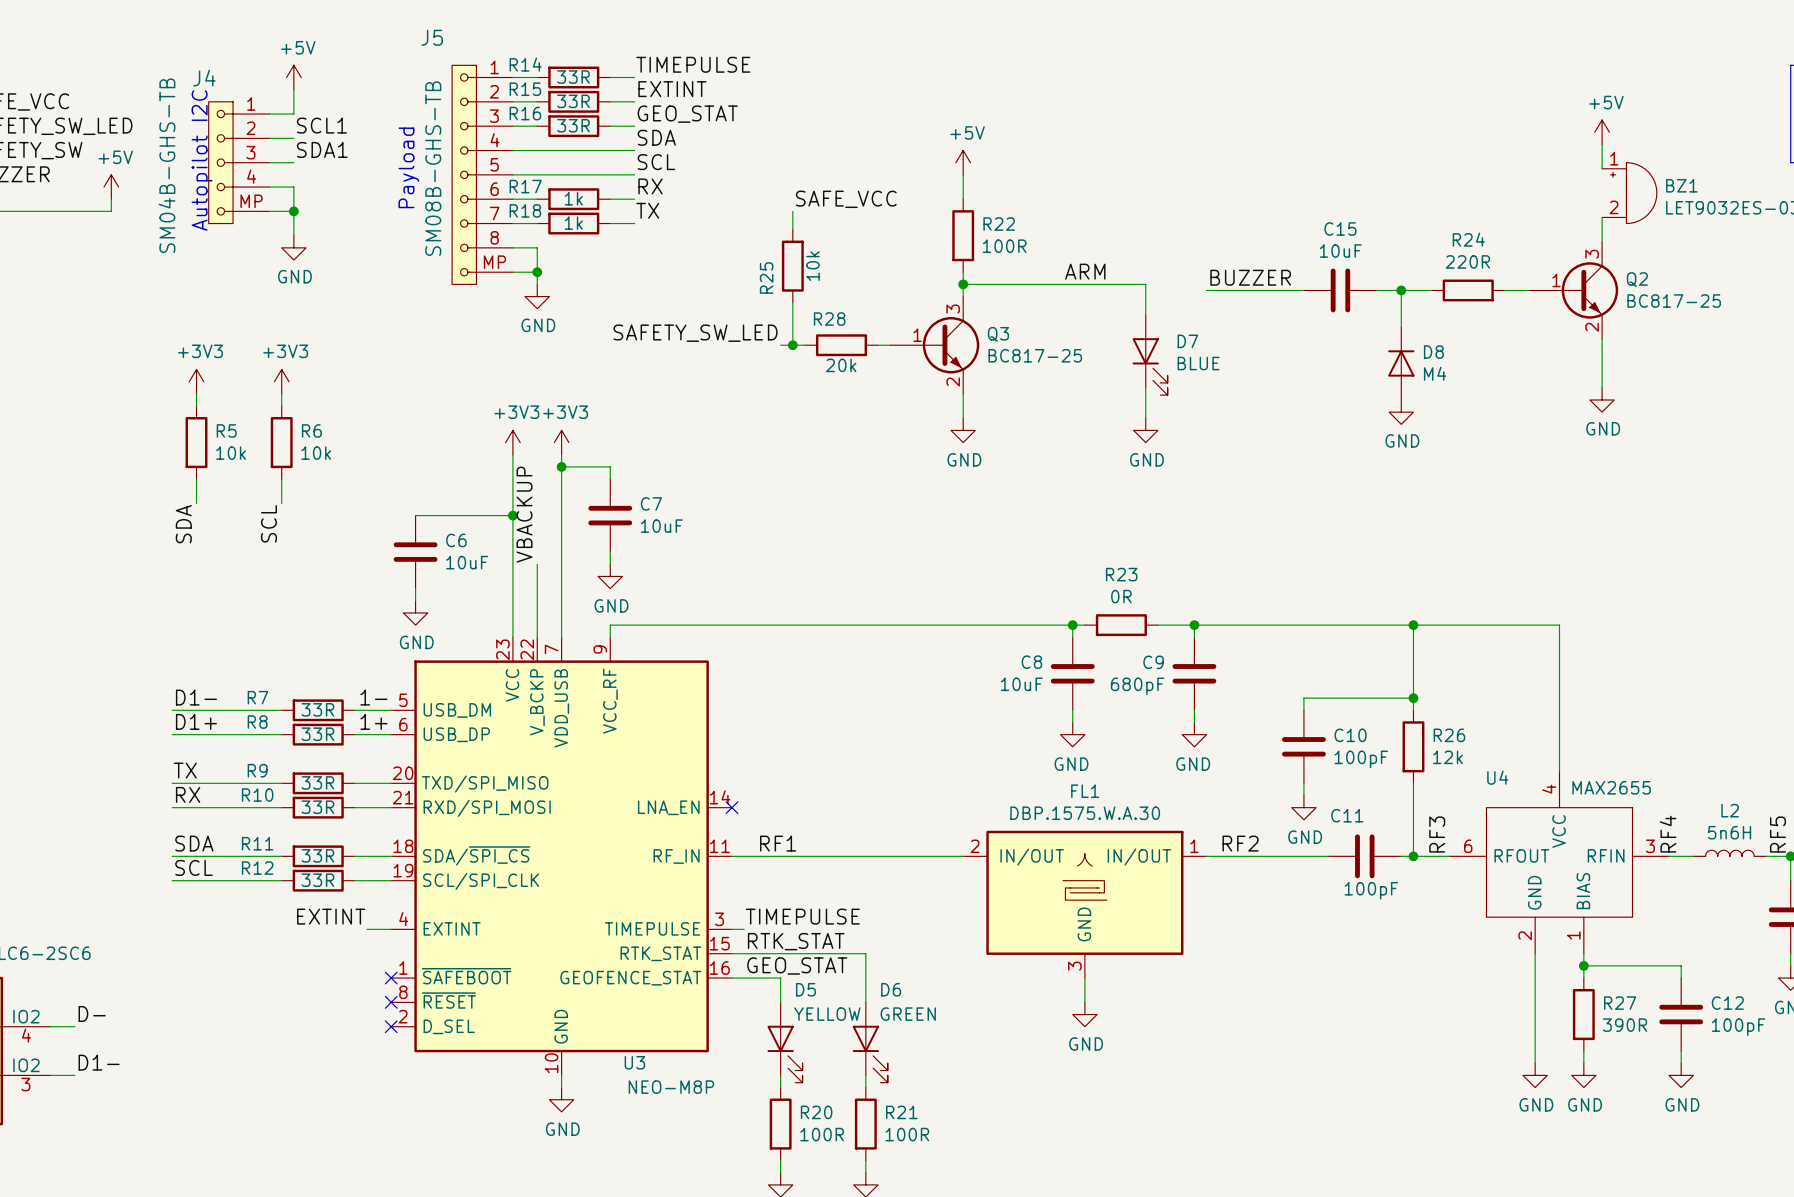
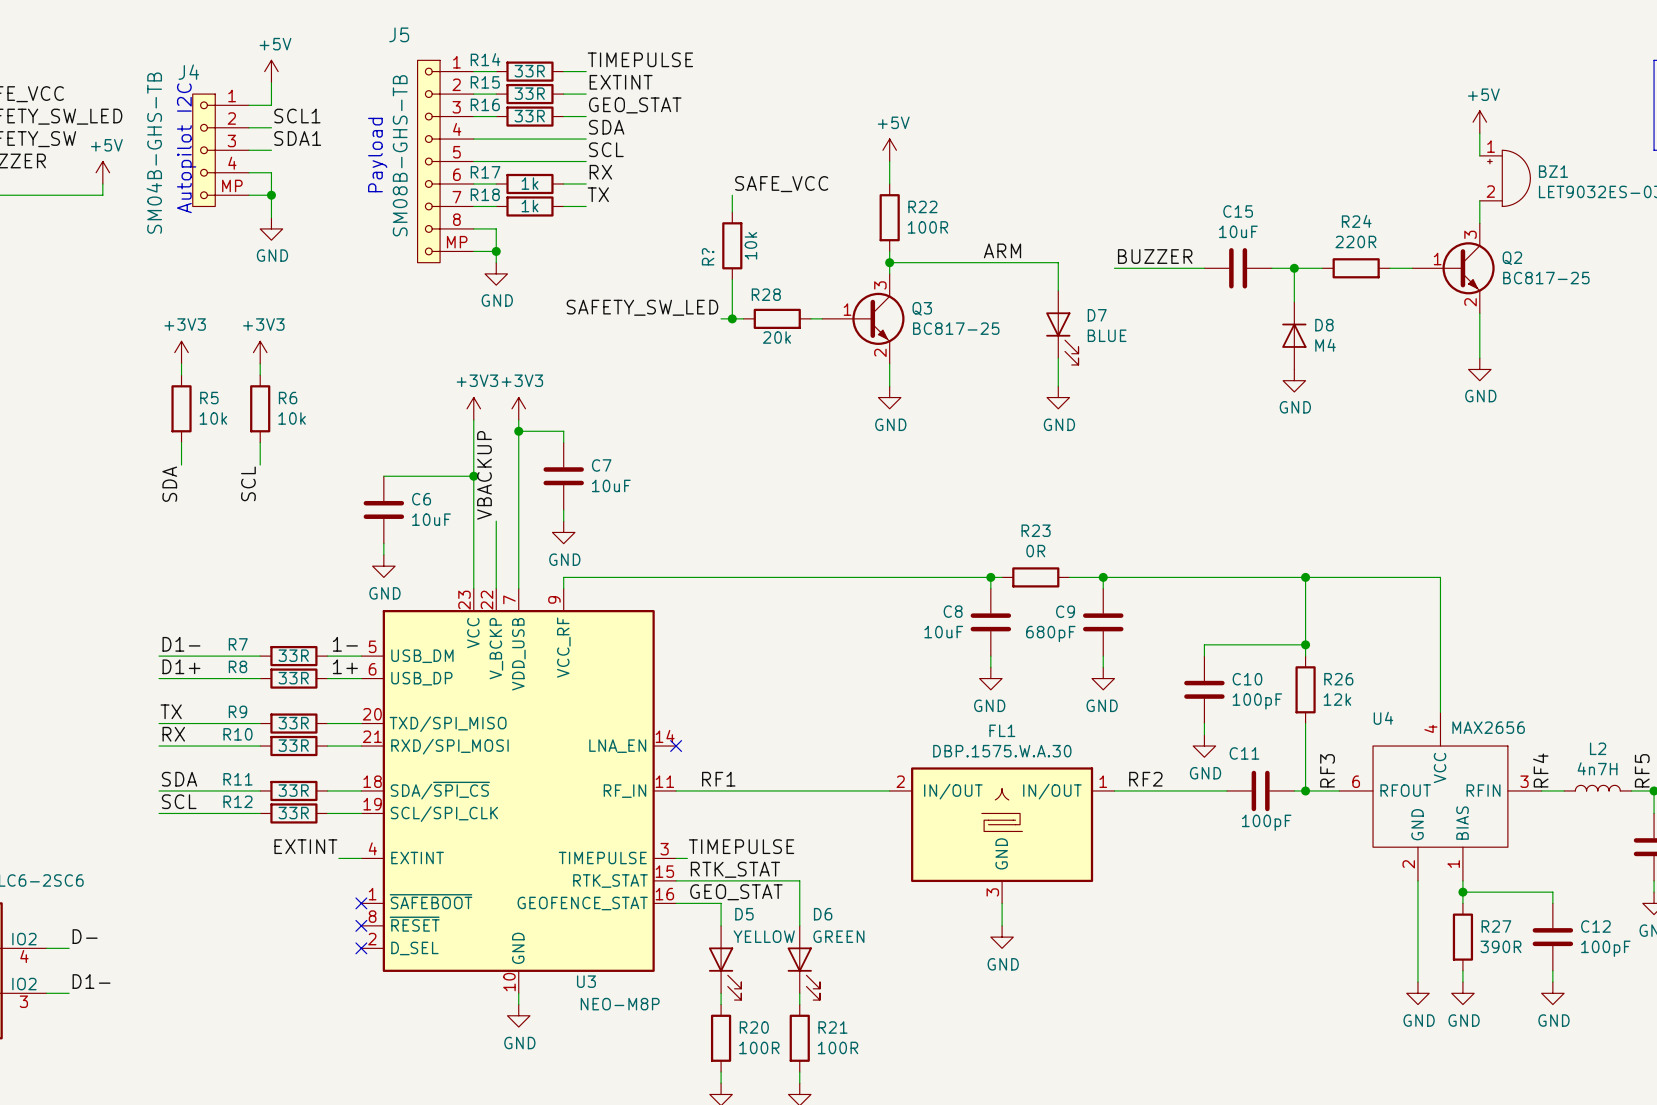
R25 name: R25 (766, 278) -> R? (708, 256)
U4 value: MAX2655 (1611, 787) -> MAX2656 (1488, 727)
L2 value: 5n6H (1729, 832) -> 4n7H (1597, 768)

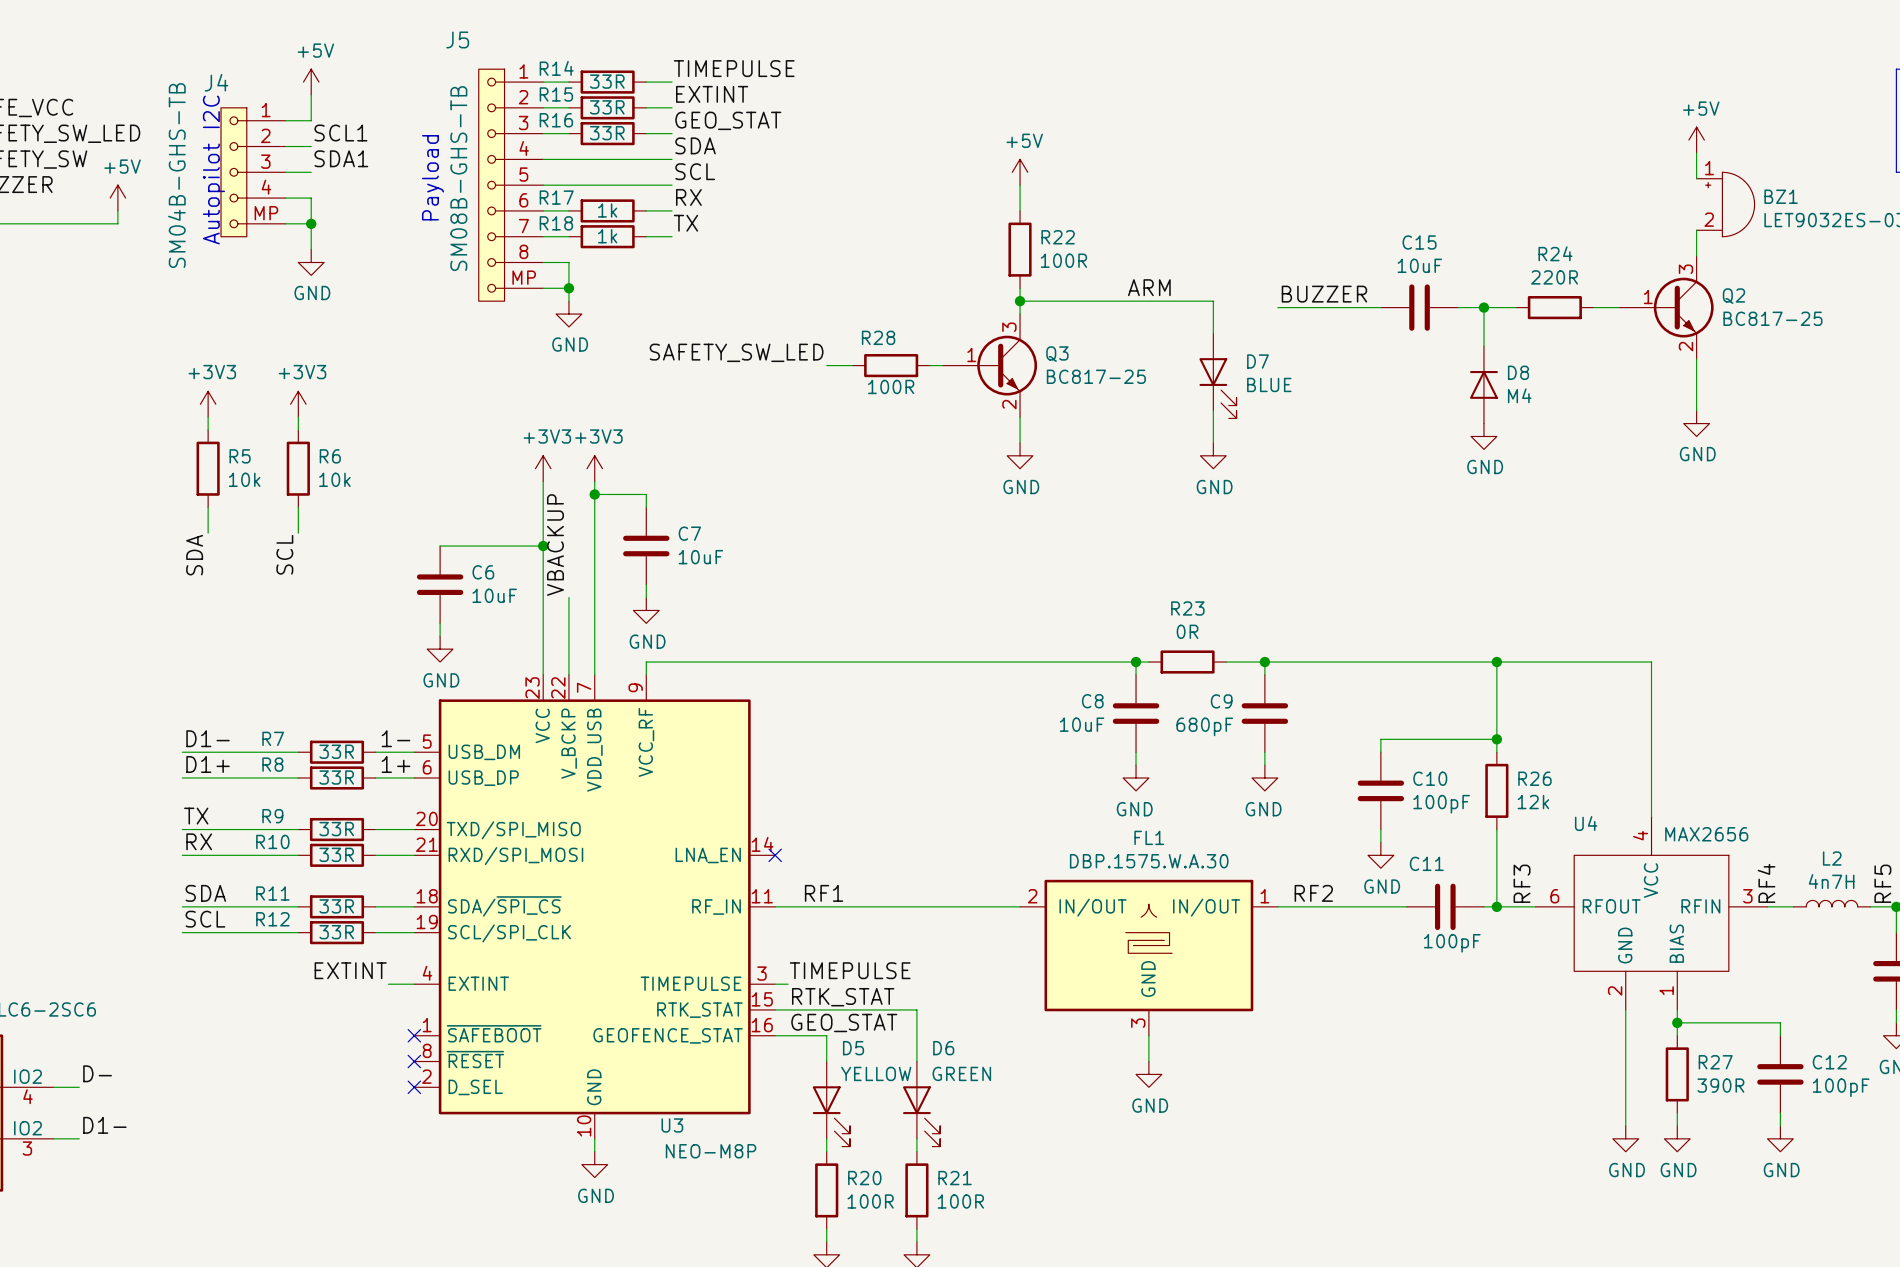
label: SAFE_VCC (781, 184) -> none
wire: (732, 195) (732, 212) -> none
R?: 10k (732, 245) -> none
wire: (732, 279) (732, 318) -> none
junction: (732, 318) -> none
R28 value: 20k (777, 337) -> 100R (891, 386)

